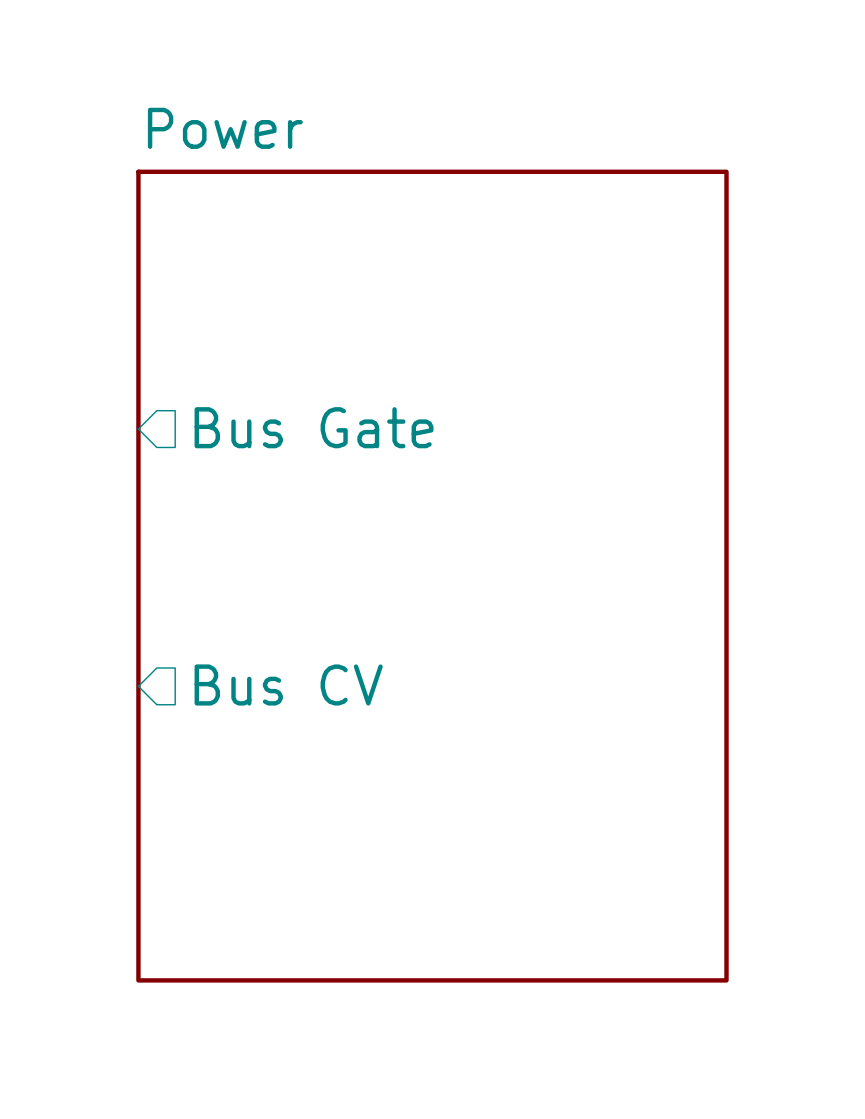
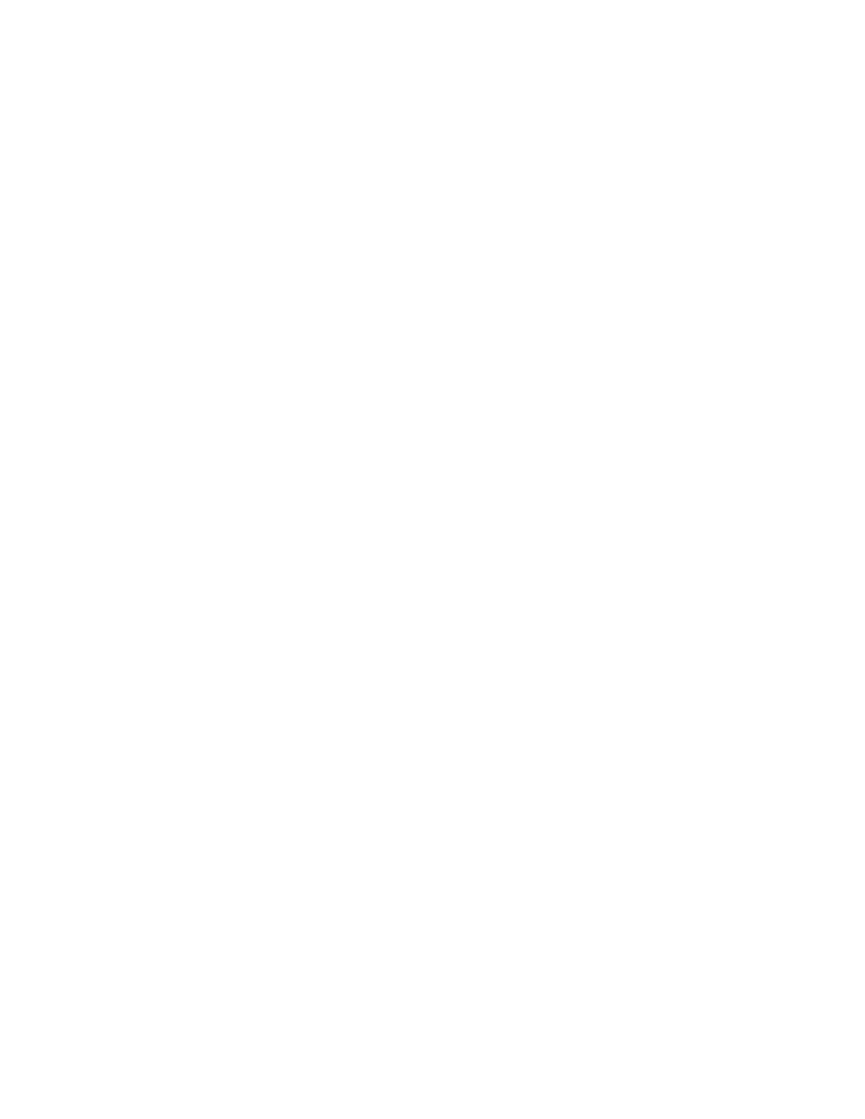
sheet pin: Bus Gate (314, 427) -> none
sheet Power: (432, 576) -> none
sheet pin: Bus CV (288, 684) -> none

